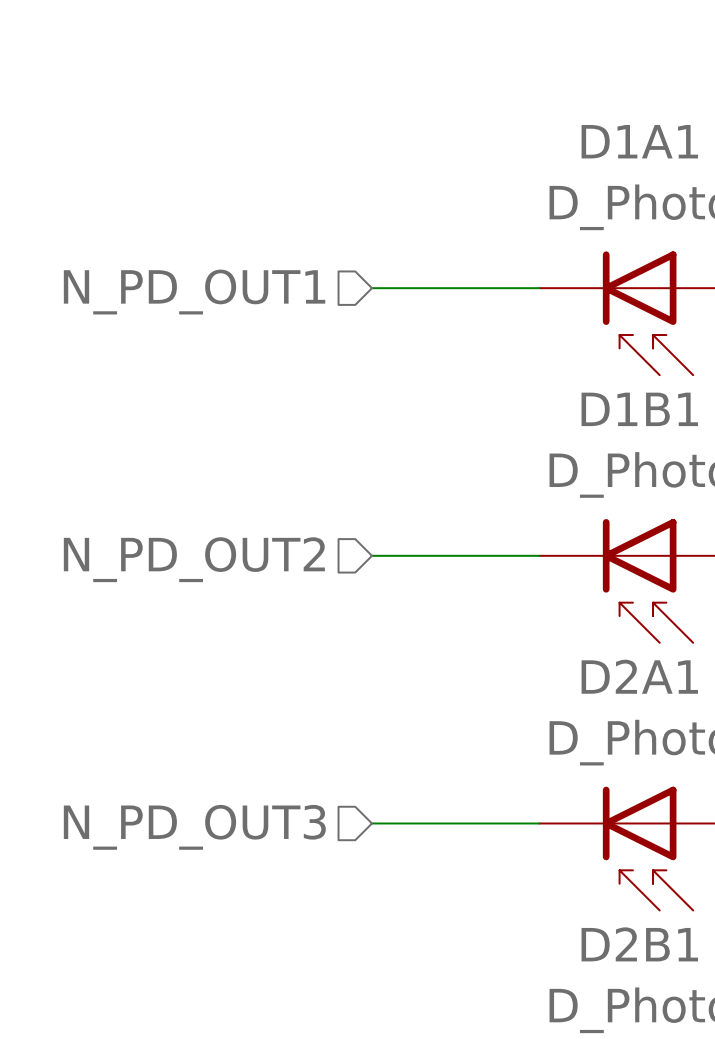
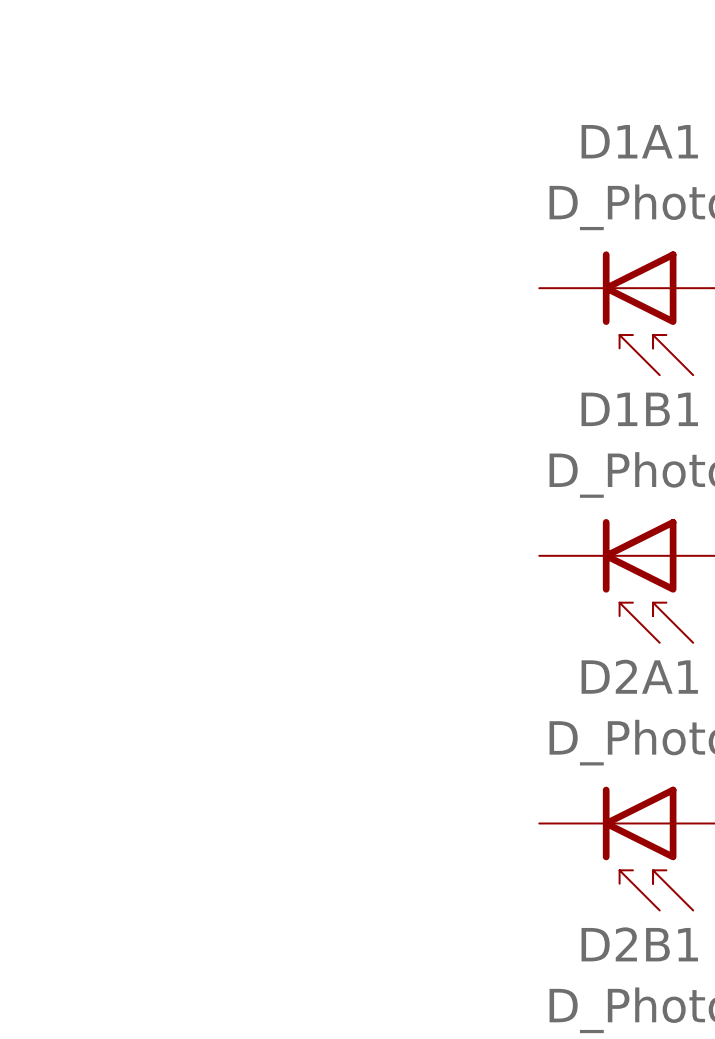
wire: (371, 288) (539, 288) -> none
hierarchical label: N_PD_OUT1 (194, 292) -> none
wire: (371, 555) (539, 555) -> none
hierarchical label: N_PD_OUT2 (194, 559) -> none
wire: (371, 823) (539, 823) -> none
hierarchical label: N_PD_OUT3 (194, 827) -> none

